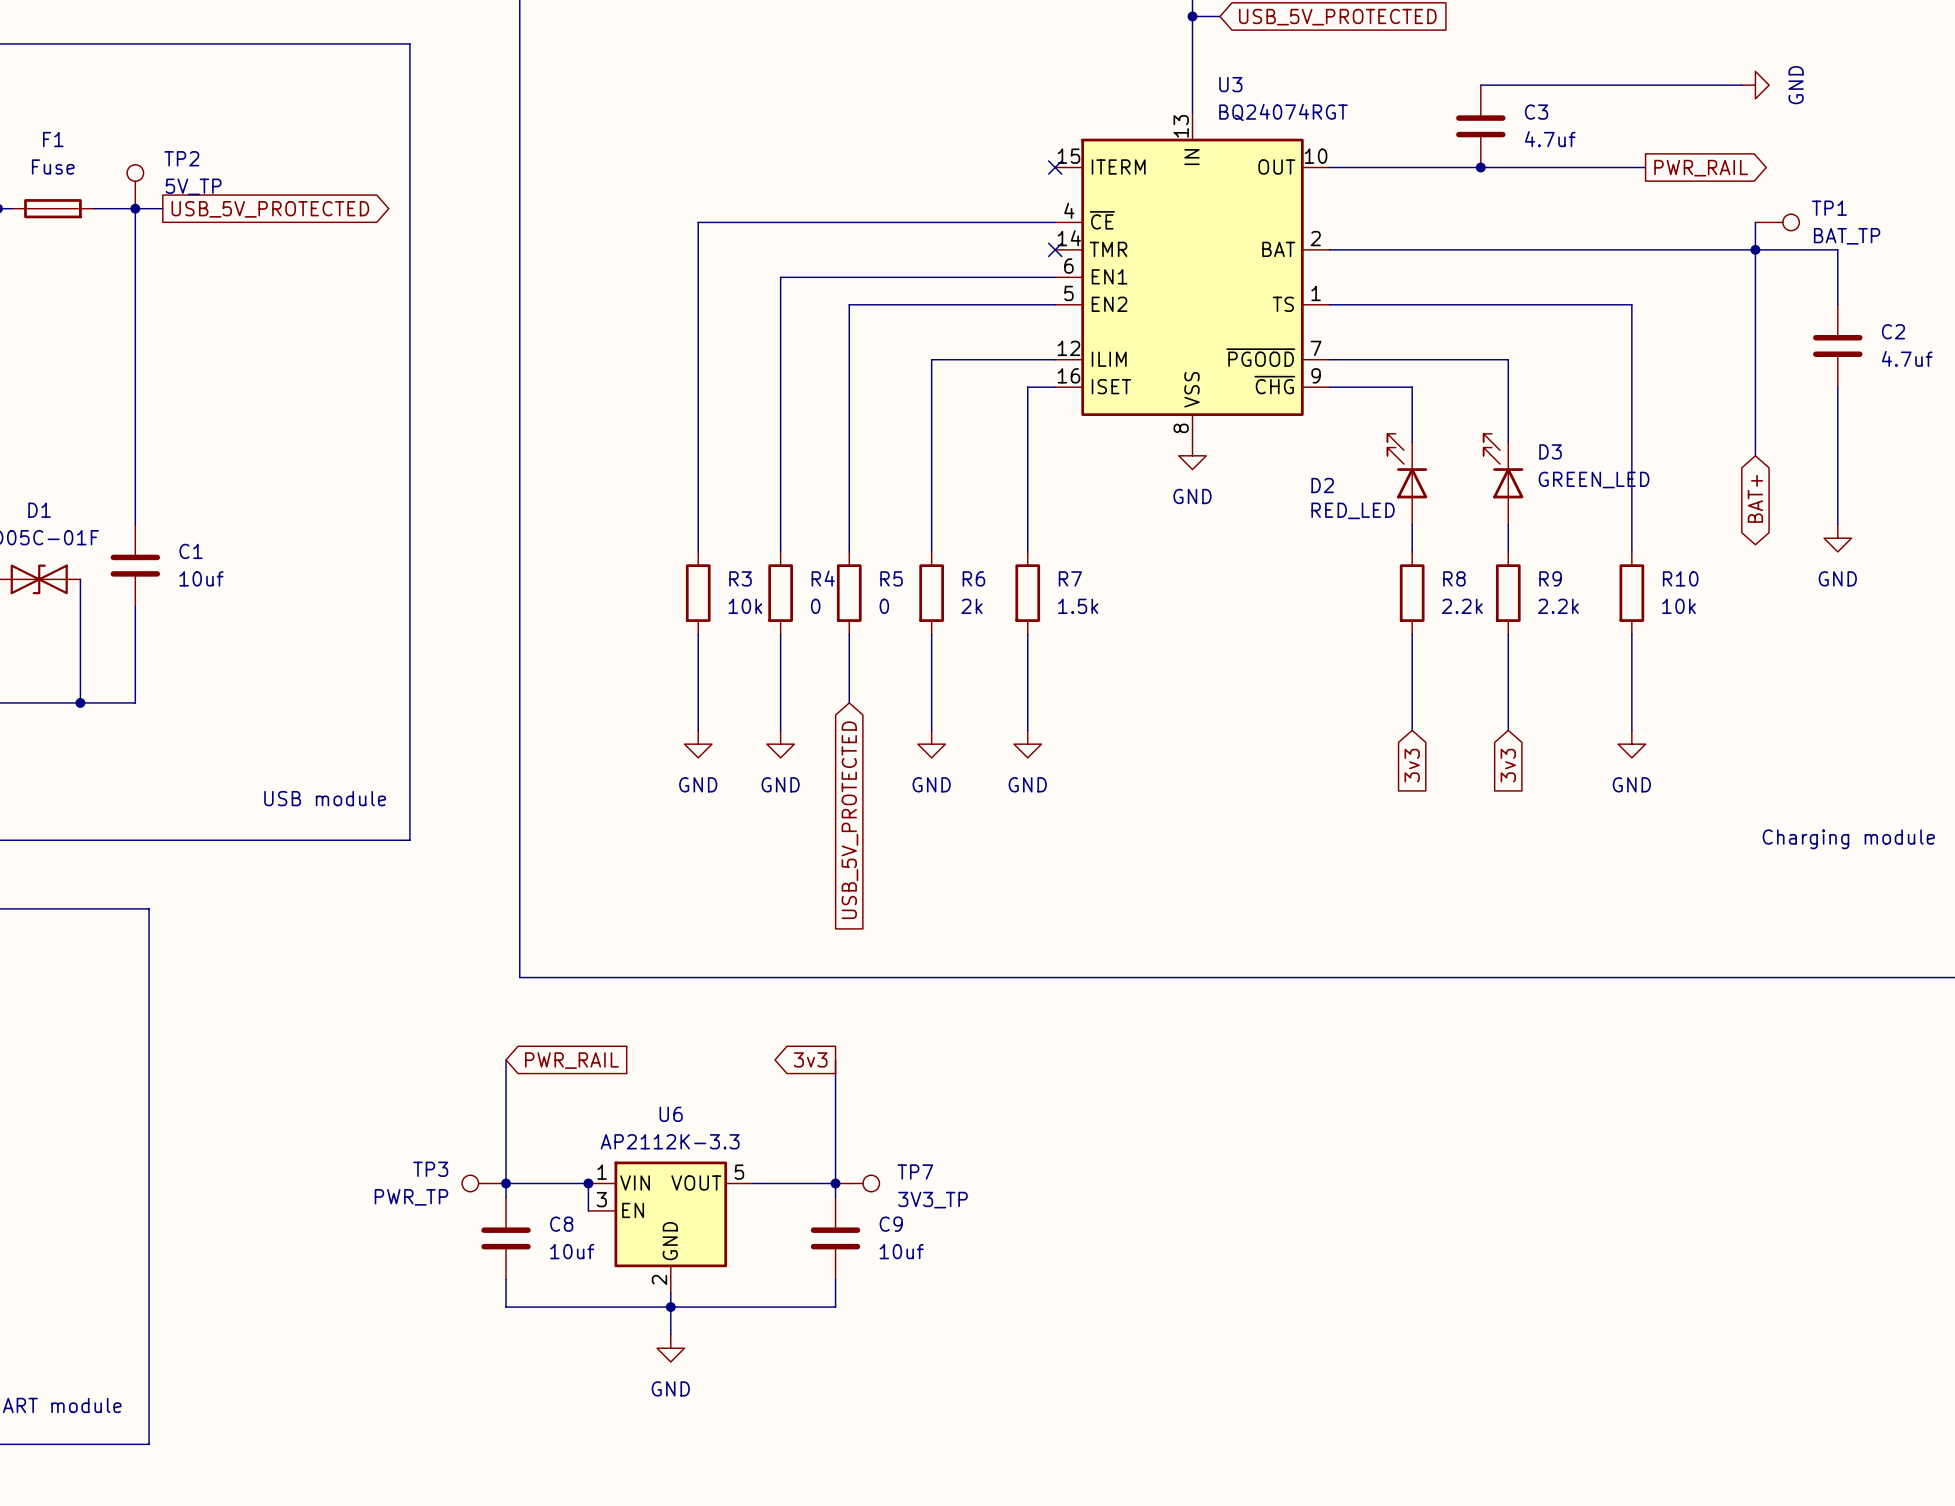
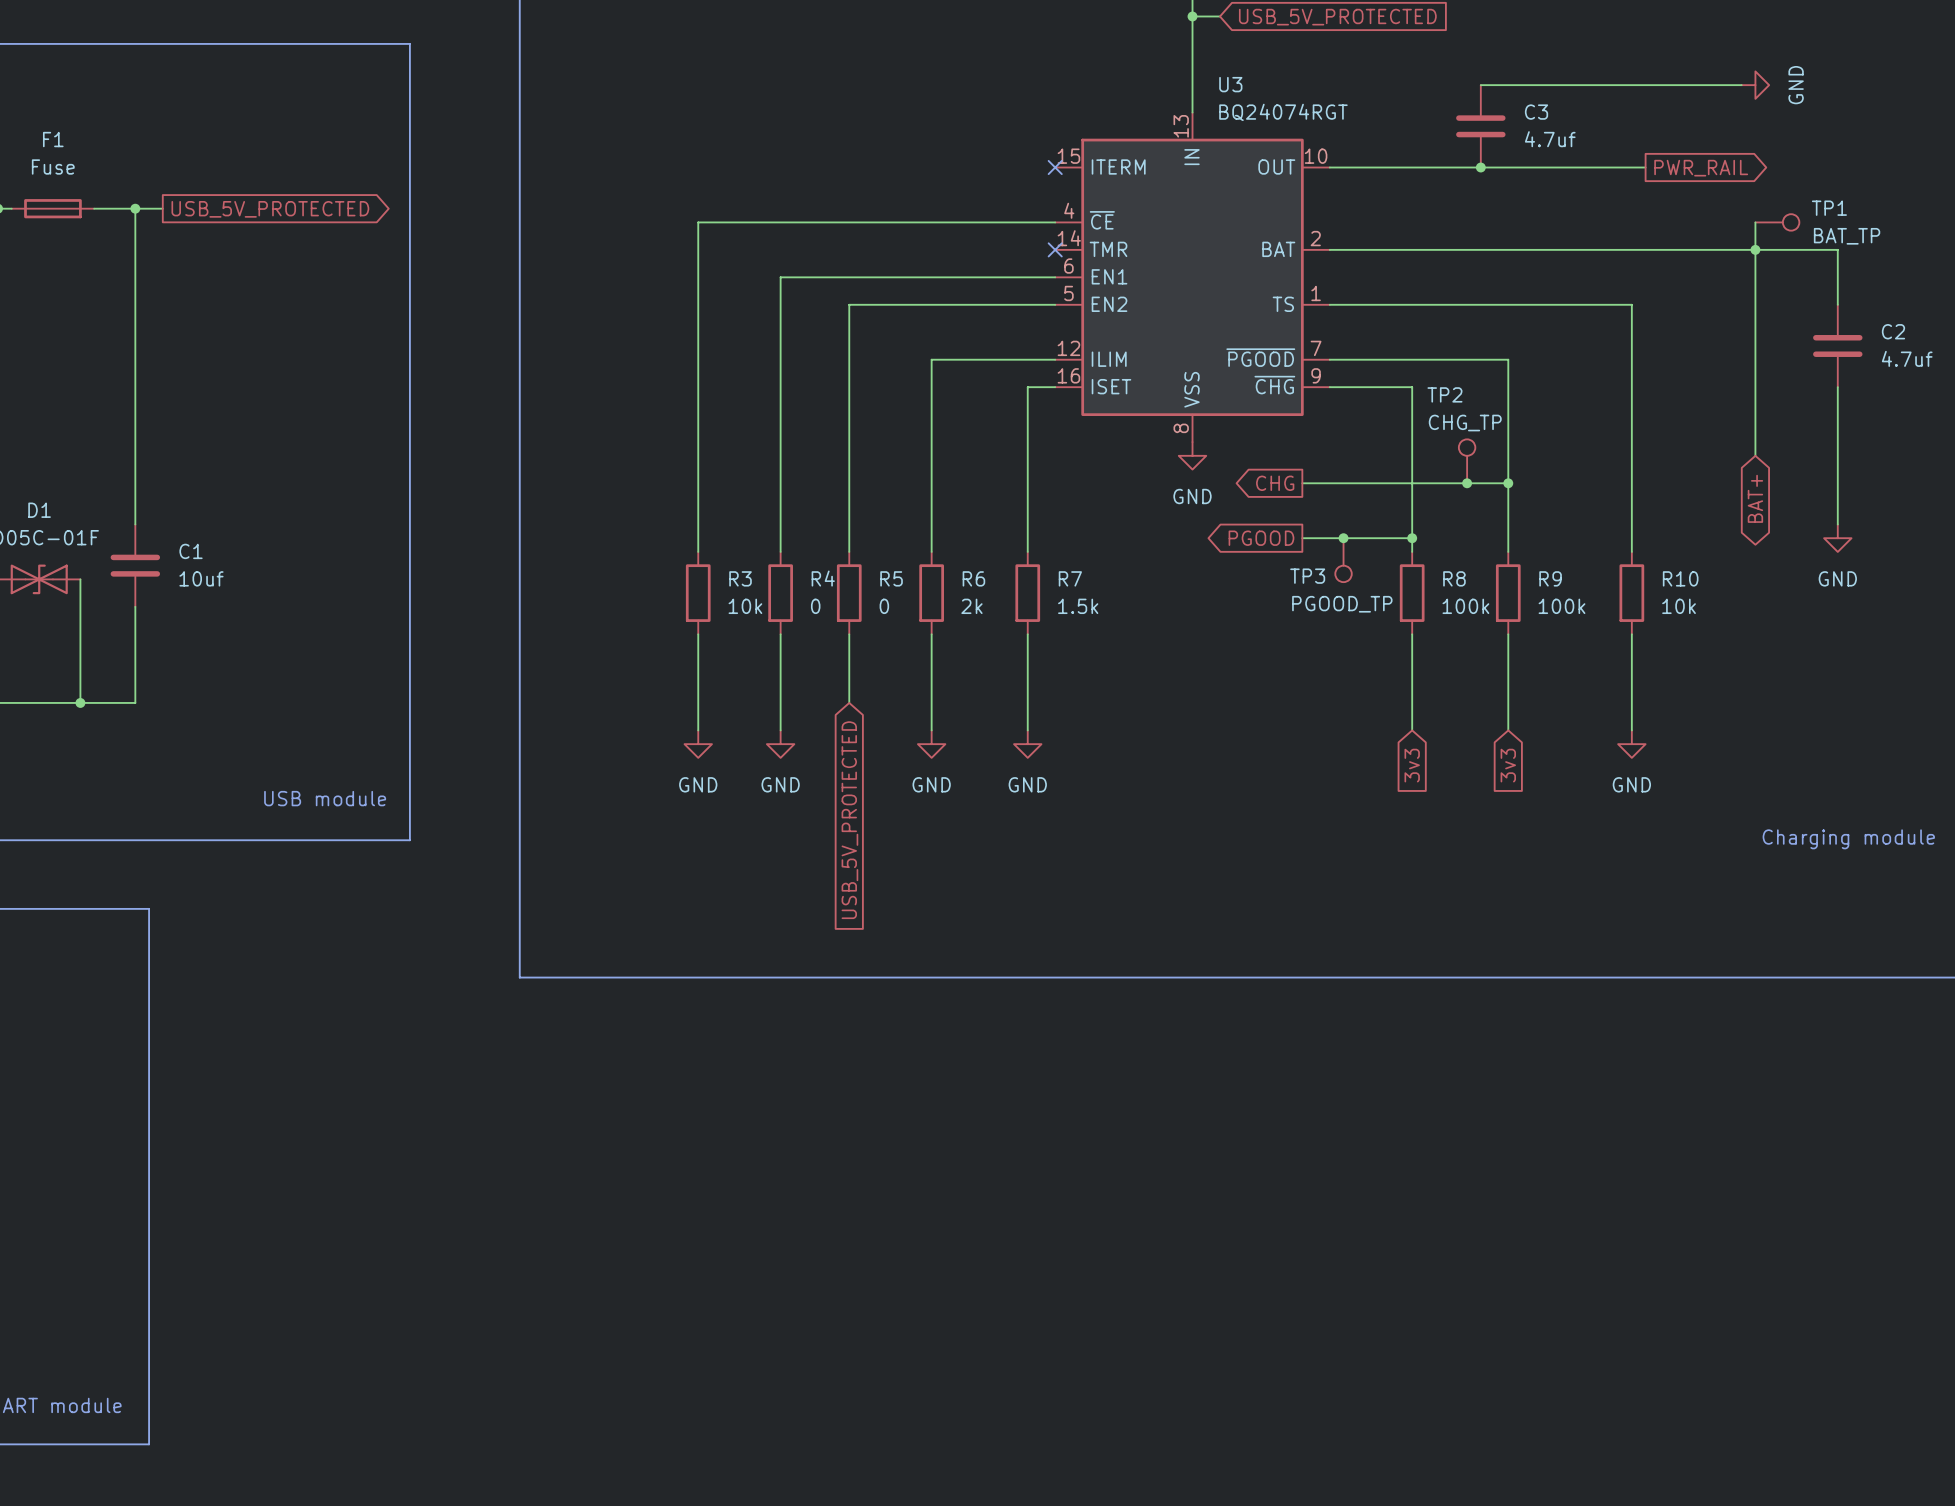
TP2 name position: TP2 (181, 158) -> TP2 (1444, 394)
TP2 position: (135, 186) -> (1467, 461)
TP2 value: 5V_TP (193, 186) -> CHG_TP (1465, 423)
D2: RED_LED (1407, 479) -> none
D3: GREEN_LED (1503, 479) -> none
global label: none -> CHG (1275, 483)
wire: none -> (1302, 483) (1508, 483)
junction: none -> (1467, 483)
junction: none -> (1508, 483)
global label: none -> PGOOD (1261, 538)
wire: none -> (1302, 538) (1412, 538)
junction: none -> (1343, 538)
junction: none -> (1412, 538)
R8 value: 2.2k (1462, 606) -> 100k (1465, 606)
R9 value: 2.2k (1558, 606) -> 100k (1562, 606)
wire: (506, 1059) (506, 1197) -> none
global label: 3v3 (810, 1059) -> none
wire: (835, 1059) (835, 1197) -> none
global label: PWR_RAIL (571, 1060) -> none
TP3 name position: TP3 (430, 1169) -> TP3 (1307, 576)
TP3 rotation: 0° (470, 1183) -> 90° counterclockwise (1343, 573)
TP3 position: (484, 1183) -> (1343, 560)
wire: (506, 1183) (588, 1183) (588, 1210) -> none
junction: (506, 1183) -> none
junction: (588, 1183) -> none
wire: (753, 1183) (835, 1183) -> none
junction: (835, 1183) -> none
TP7: 3V3_TP (857, 1183) -> none
TP3 value: PWR_TP (411, 1197) -> PGOOD_TP (1342, 604)
U6: AP2112K-3.3 (670, 1227) -> none
C8: 10uf (506, 1238) -> none
C9: 10uf (835, 1238) -> none
wire: (506, 1279) (506, 1307) (835, 1307) (835, 1279) -> none
wire: (670, 1293) (670, 1334) -> none
junction: (670, 1307) -> none
power symbol: GND (670, 1348) -> none

